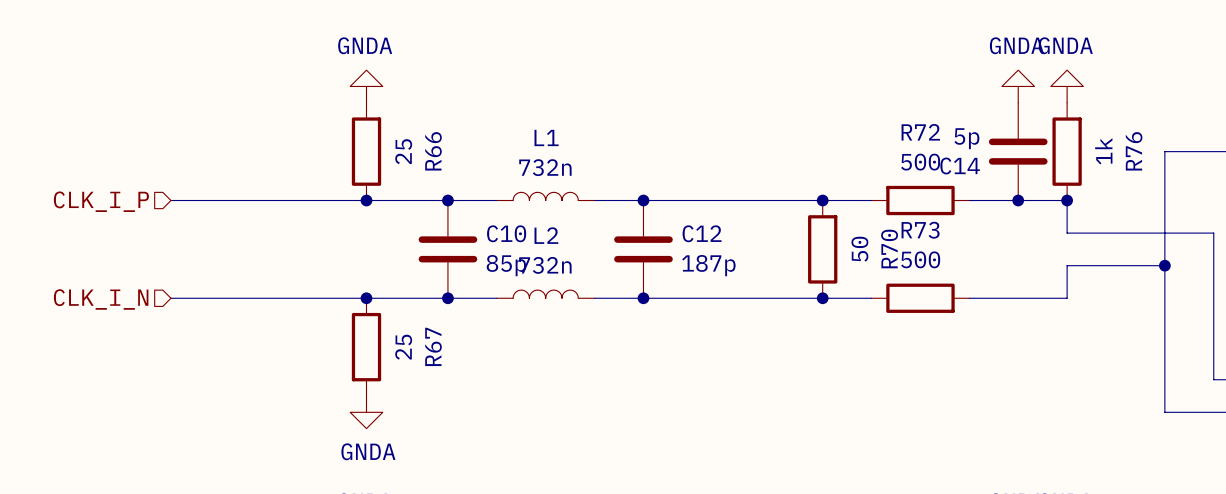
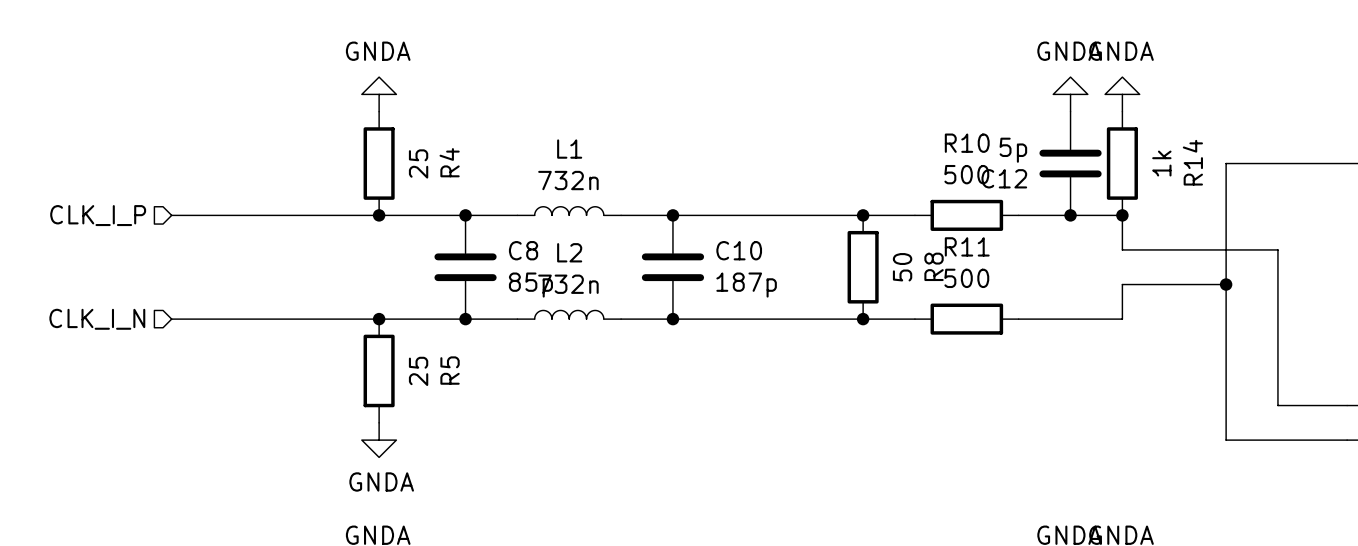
R72 name: R72 (920, 132) -> R10 (967, 143)
R66 name: R66 (433, 151) -> R4 (449, 162)
R76 name: R76 (1134, 151) -> R14 (1192, 162)
C14 name: C14 (960, 166) -> C12 (1004, 178)
R73 name: R73 (920, 230) -> R11 (967, 246)
C10 name: C10 (506, 233) -> C8 (523, 250)
C12 name: C12 (702, 233) -> C10 (739, 250)
R70 name: R70 (889, 248) -> R8 (934, 266)
R67 name: R67 (433, 346) -> R5 (450, 370)

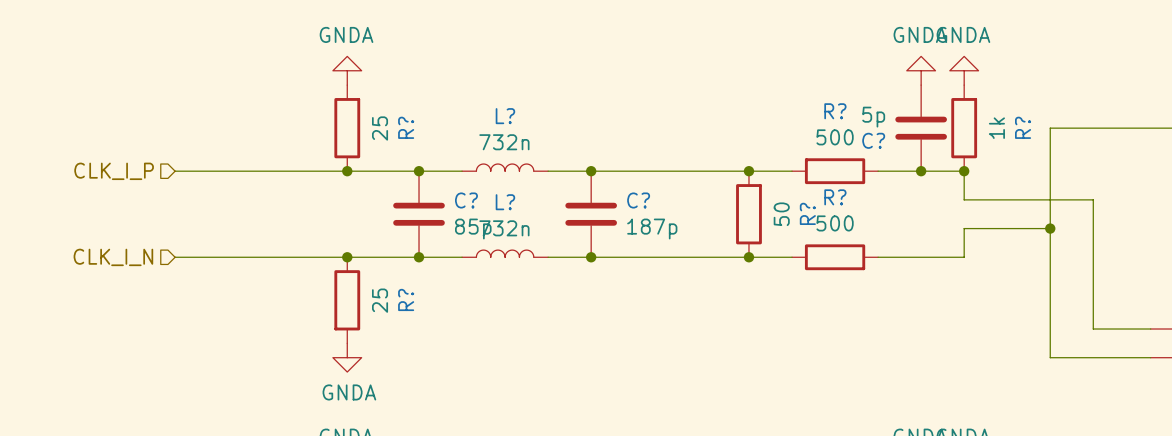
R10 name: R10 (967, 143) -> R? (835, 111)
L1 name: L1 (569, 149) -> L? (505, 116)
R4 name: R4 (449, 162) -> R? (406, 127)
R14 name: R14 (1192, 162) -> R? (1023, 127)
C12 name: C12 (1004, 178) -> C? (873, 140)
R11 name: R11 (967, 246) -> R? (835, 197)
C8 name: C8 (523, 250) -> C? (466, 200)
C10 name: C10 (739, 250) -> C? (638, 200)
L2 name: L2 (569, 252) -> L? (505, 202)
R8 name: R8 (934, 266) -> R? (807, 213)
R5 name: R5 (450, 370) -> R? (406, 299)

